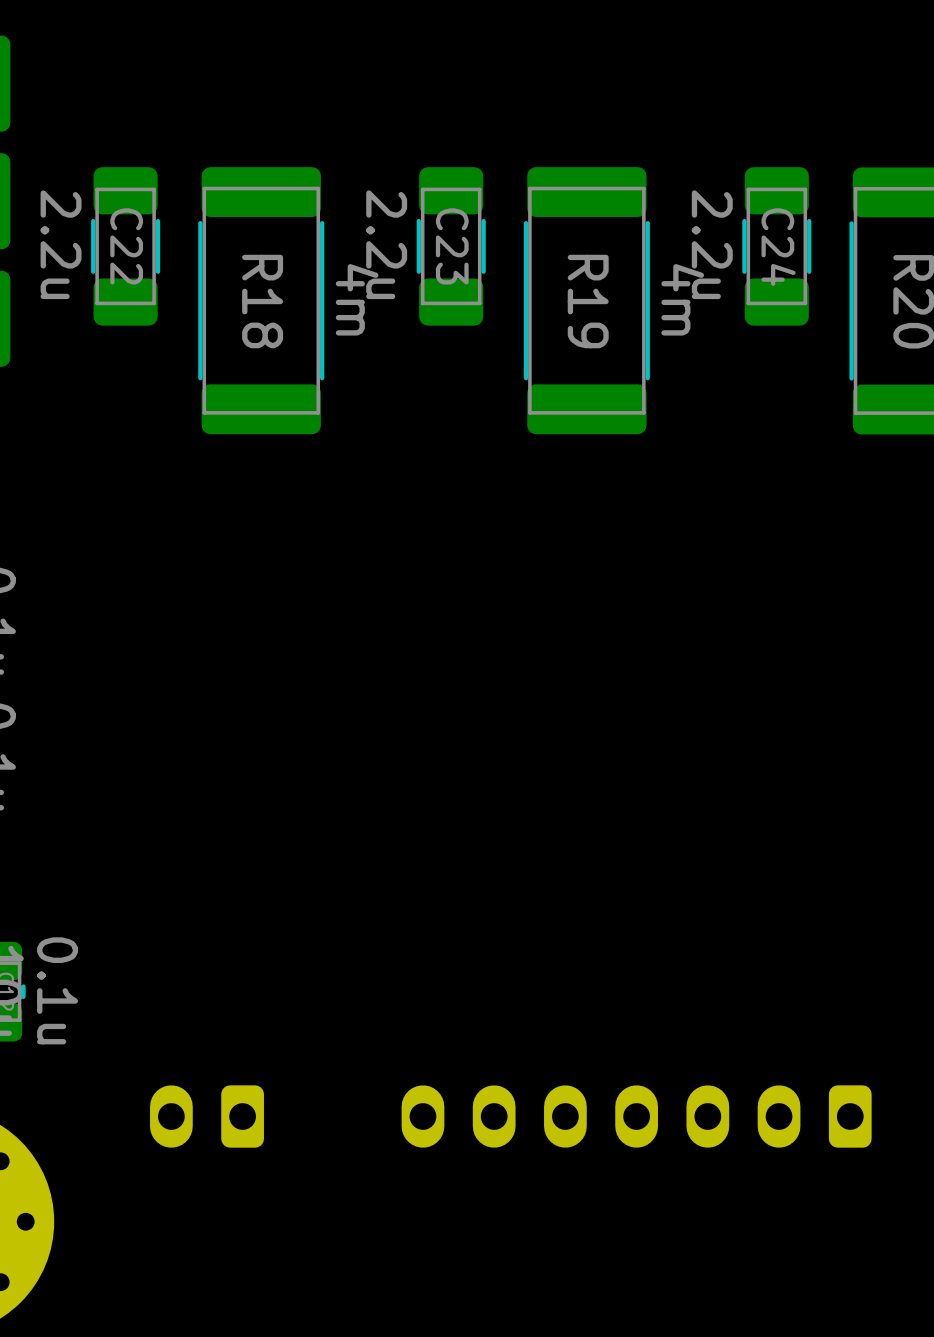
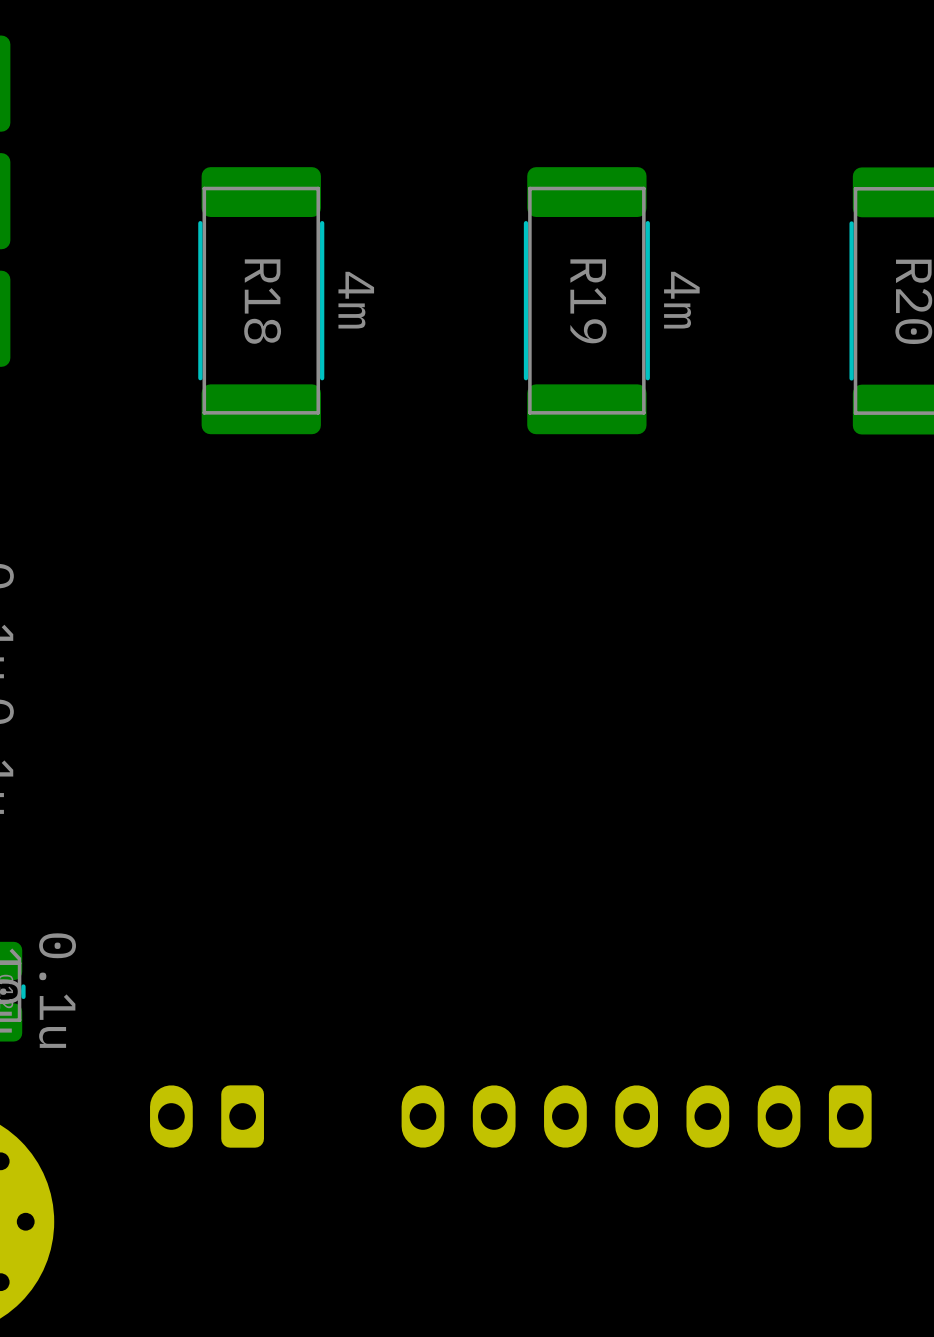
C22: 2.2u (125, 246) -> none
C23: 2.2u (451, 246) -> none
C24: 2.2u (776, 246) -> none

